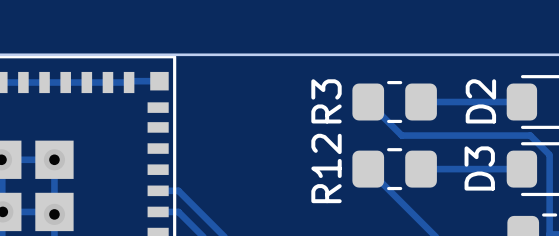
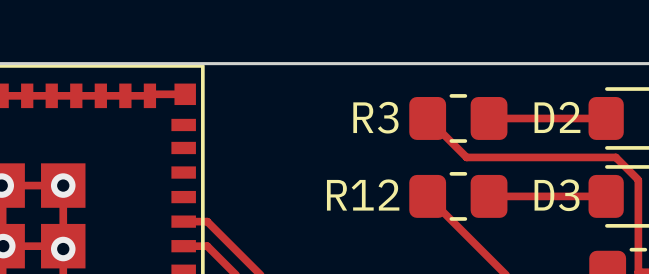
R3 name rotation: 0° (326, 101) -> 90° clockwise (375, 117)
D2 name rotation: 0° (480, 101) -> 90° clockwise (557, 117)
R12 name rotation: 0° (326, 168) -> 90° clockwise (363, 194)
D3 name rotation: 0° (479, 168) -> 90° clockwise (557, 195)

